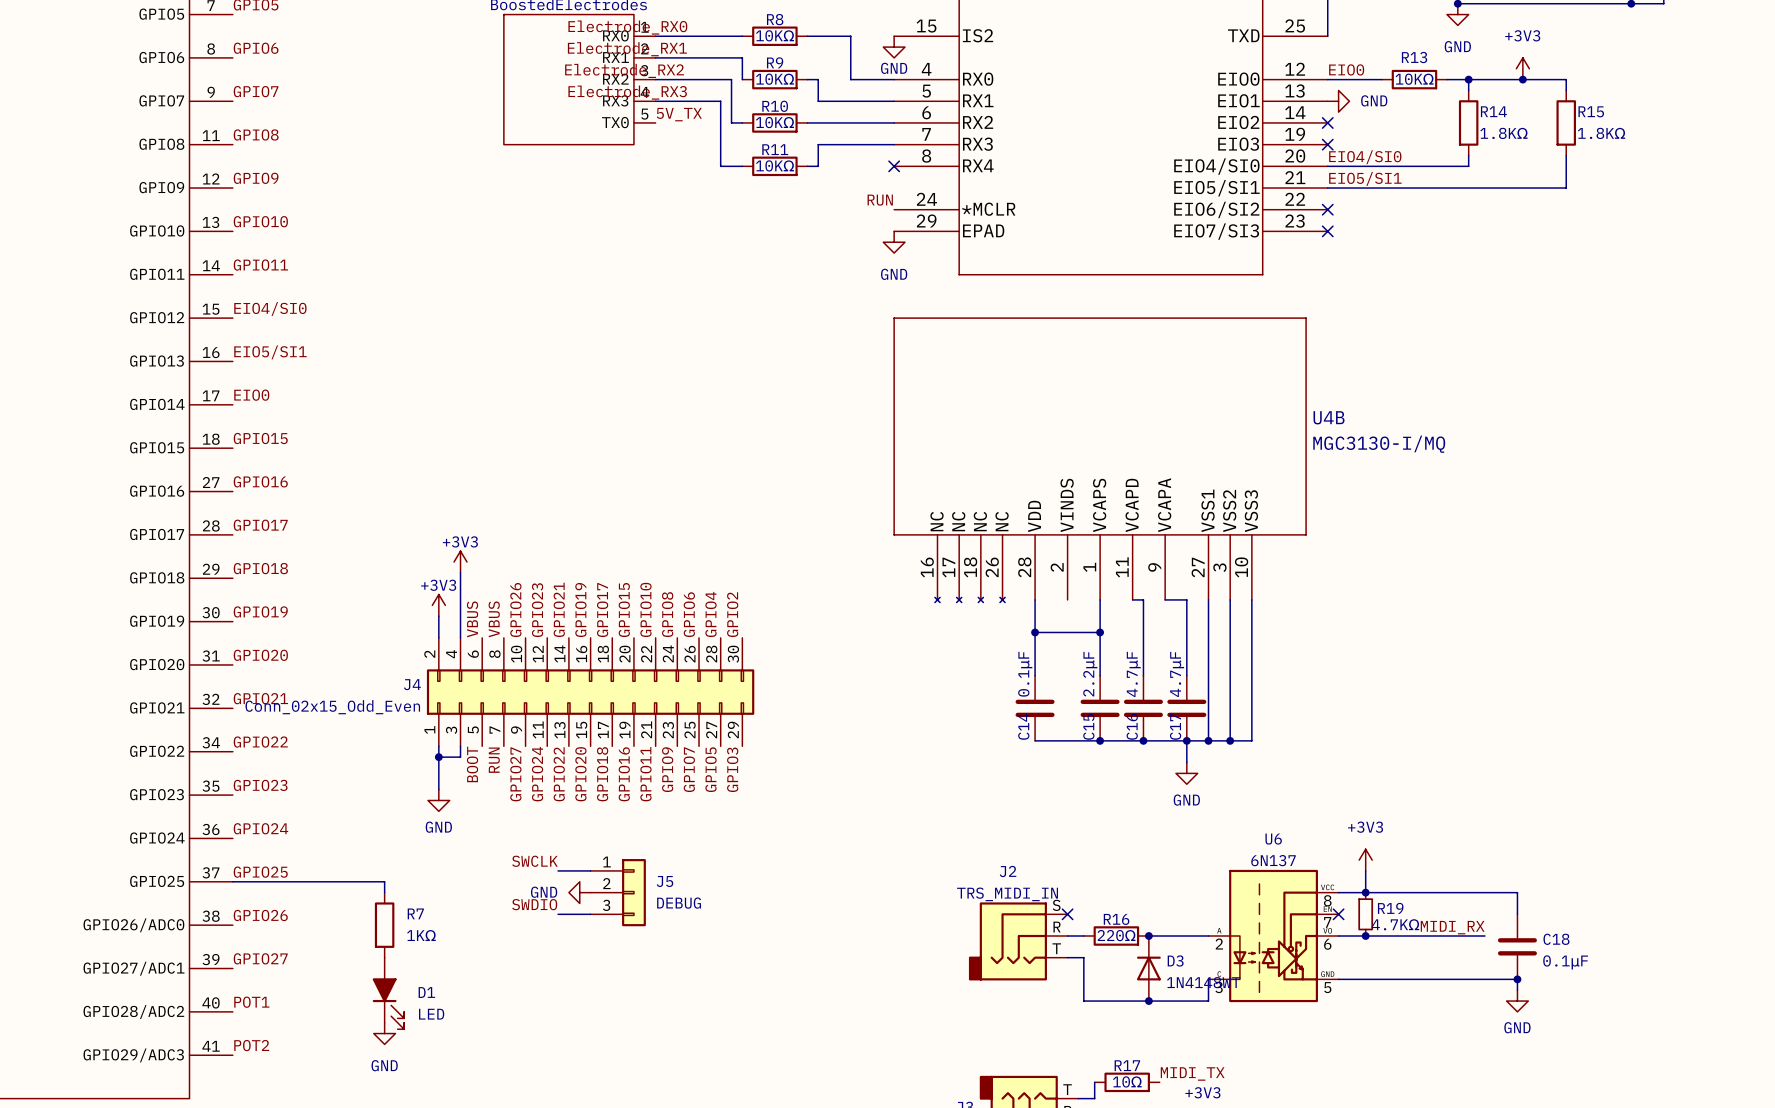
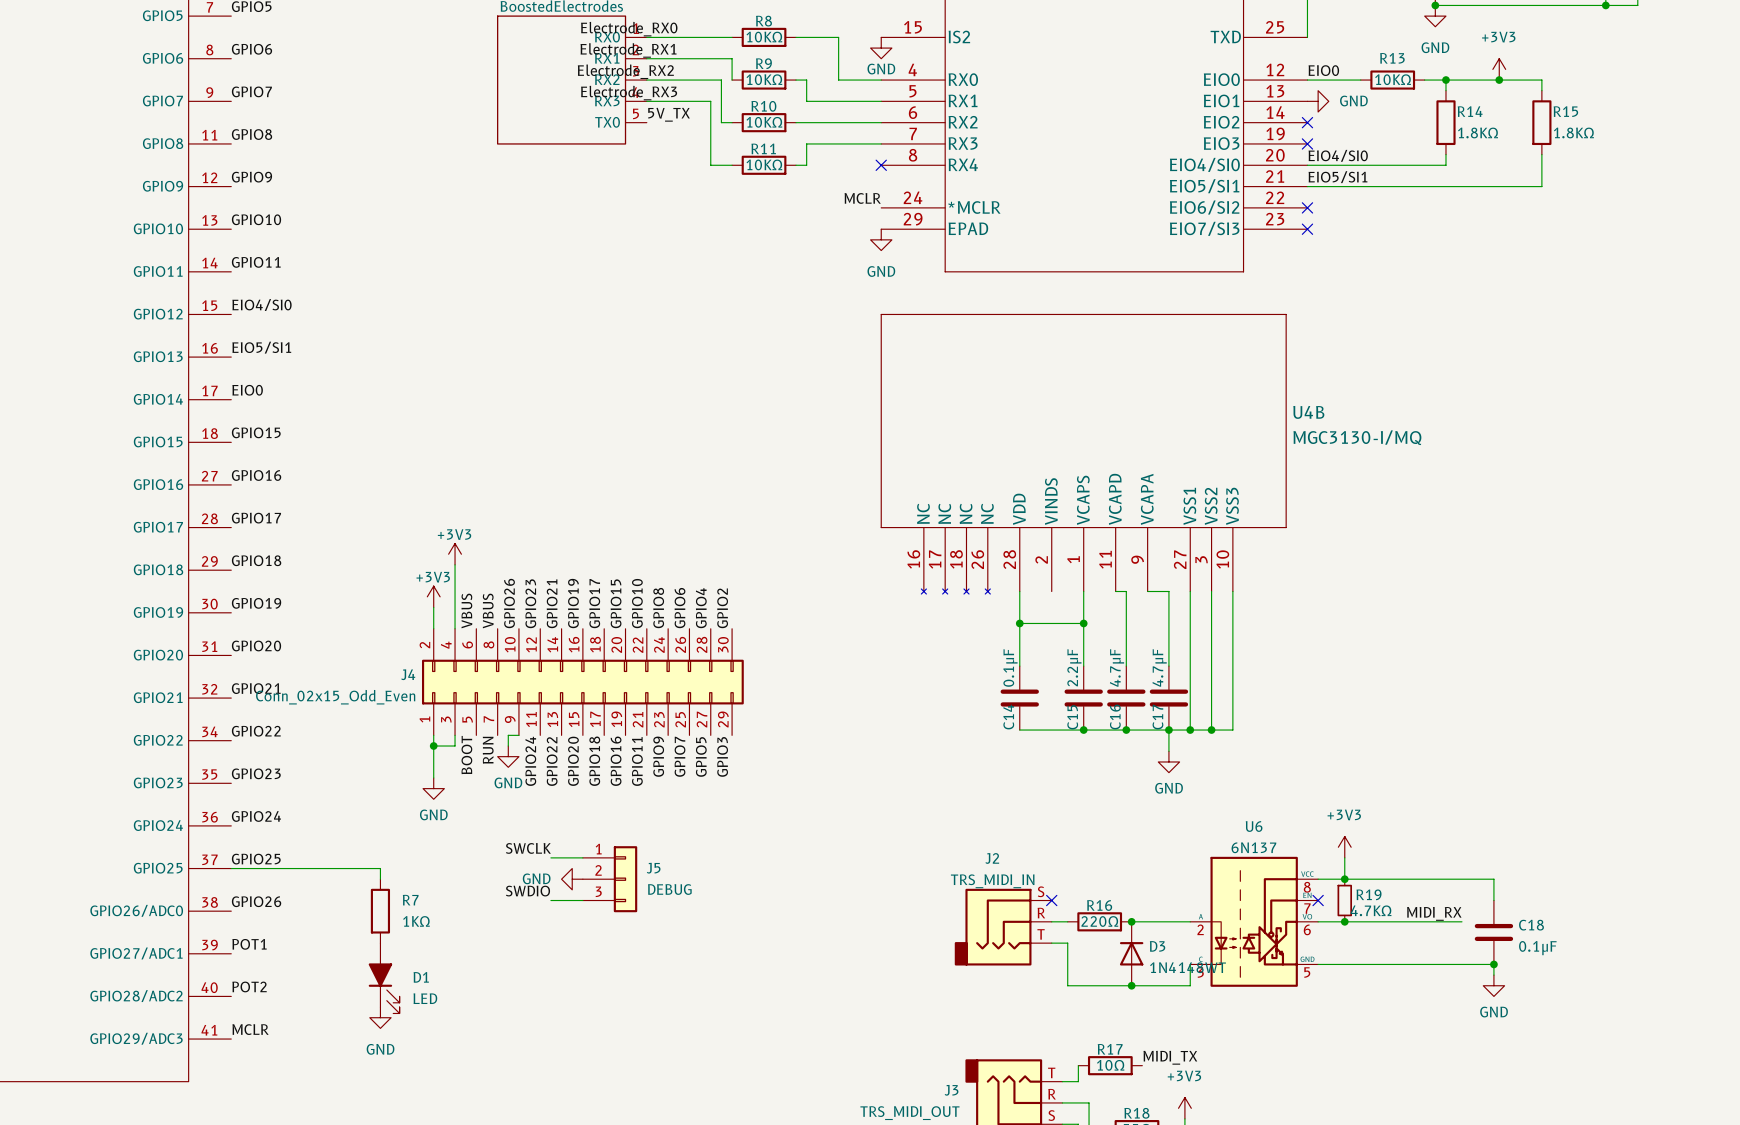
label: RUN (880, 200) -> MCLR (862, 198)
wire: none -> (518, 735) (508, 735) (508, 746)
power symbol: none -> GND (508, 756)
label: GPIO27 (515, 774) -> none
label: GPIO27 (260, 958) -> POT1 (249, 944)
label: POT1 (251, 1002) -> POT2 (249, 986)
label: POT2 (251, 1045) -> MCLR (250, 1029)

